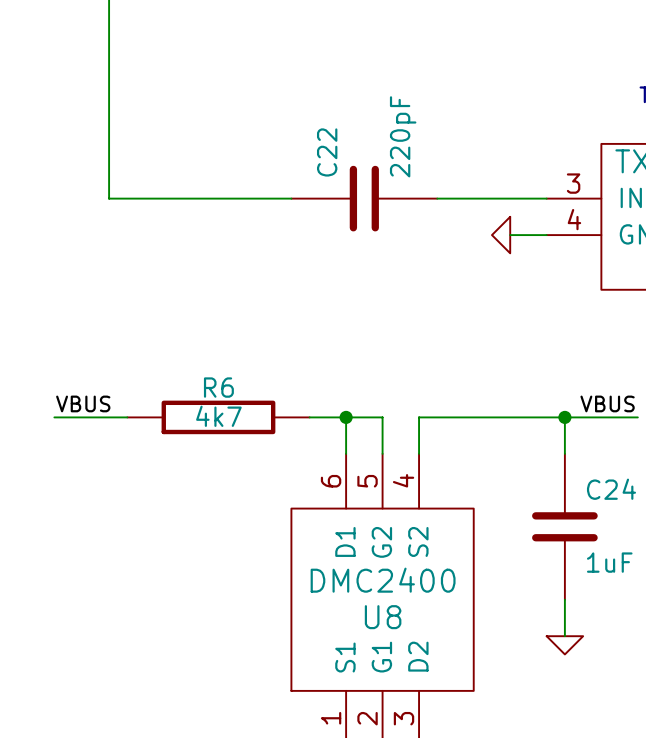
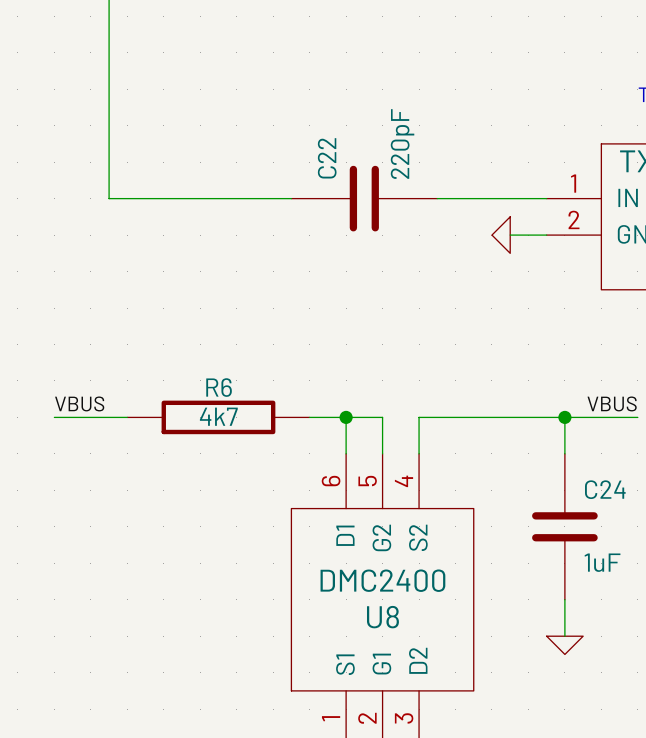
part pin number: 3 (573, 183) -> 1 (573, 183)
part pin number: 4 (574, 219) -> 2 (574, 219)

